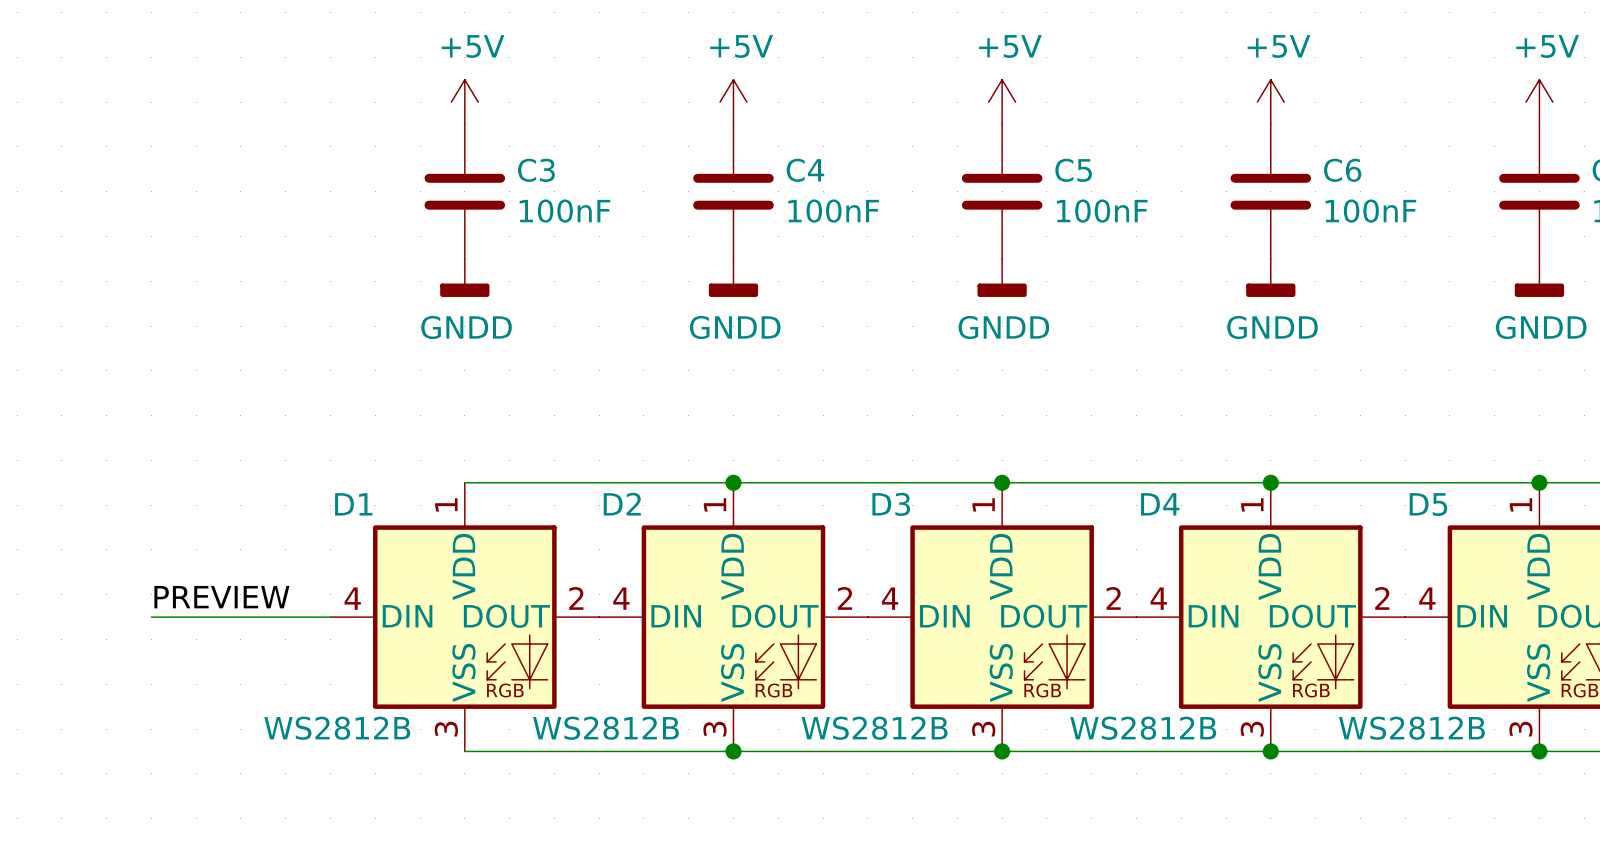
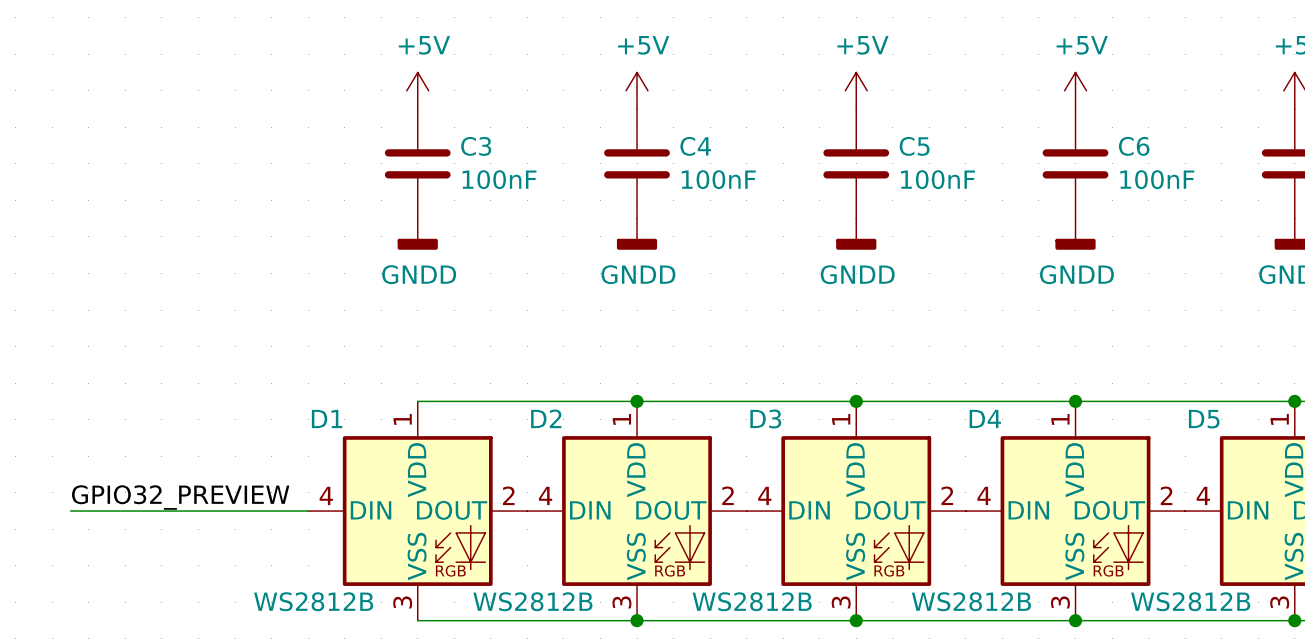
label: PREVIEW (221, 597) -> GPIO32_PREVIEW (180, 497)
wire: none -> (70, 511) (161, 511)

